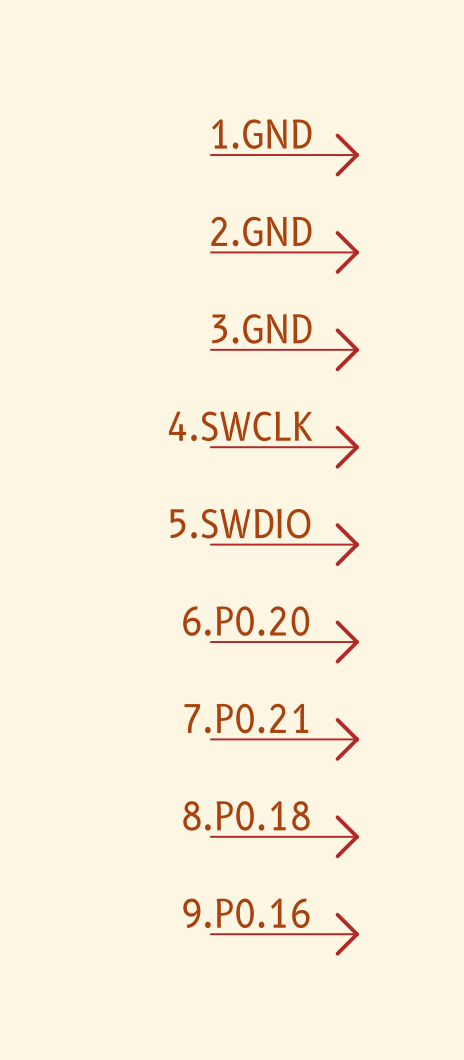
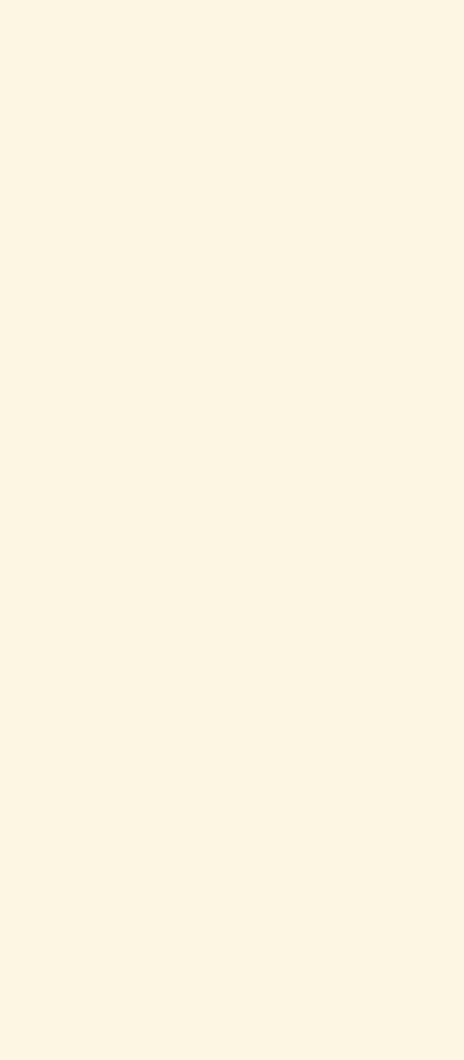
part: (284, 155) -> none
part: (284, 252) -> none
part: (284, 349) -> none
part: (284, 447) -> none
part: (284, 544) -> none
part: (284, 642) -> none
part: (284, 739) -> none
part: (284, 836) -> none
part: (284, 934) -> none

